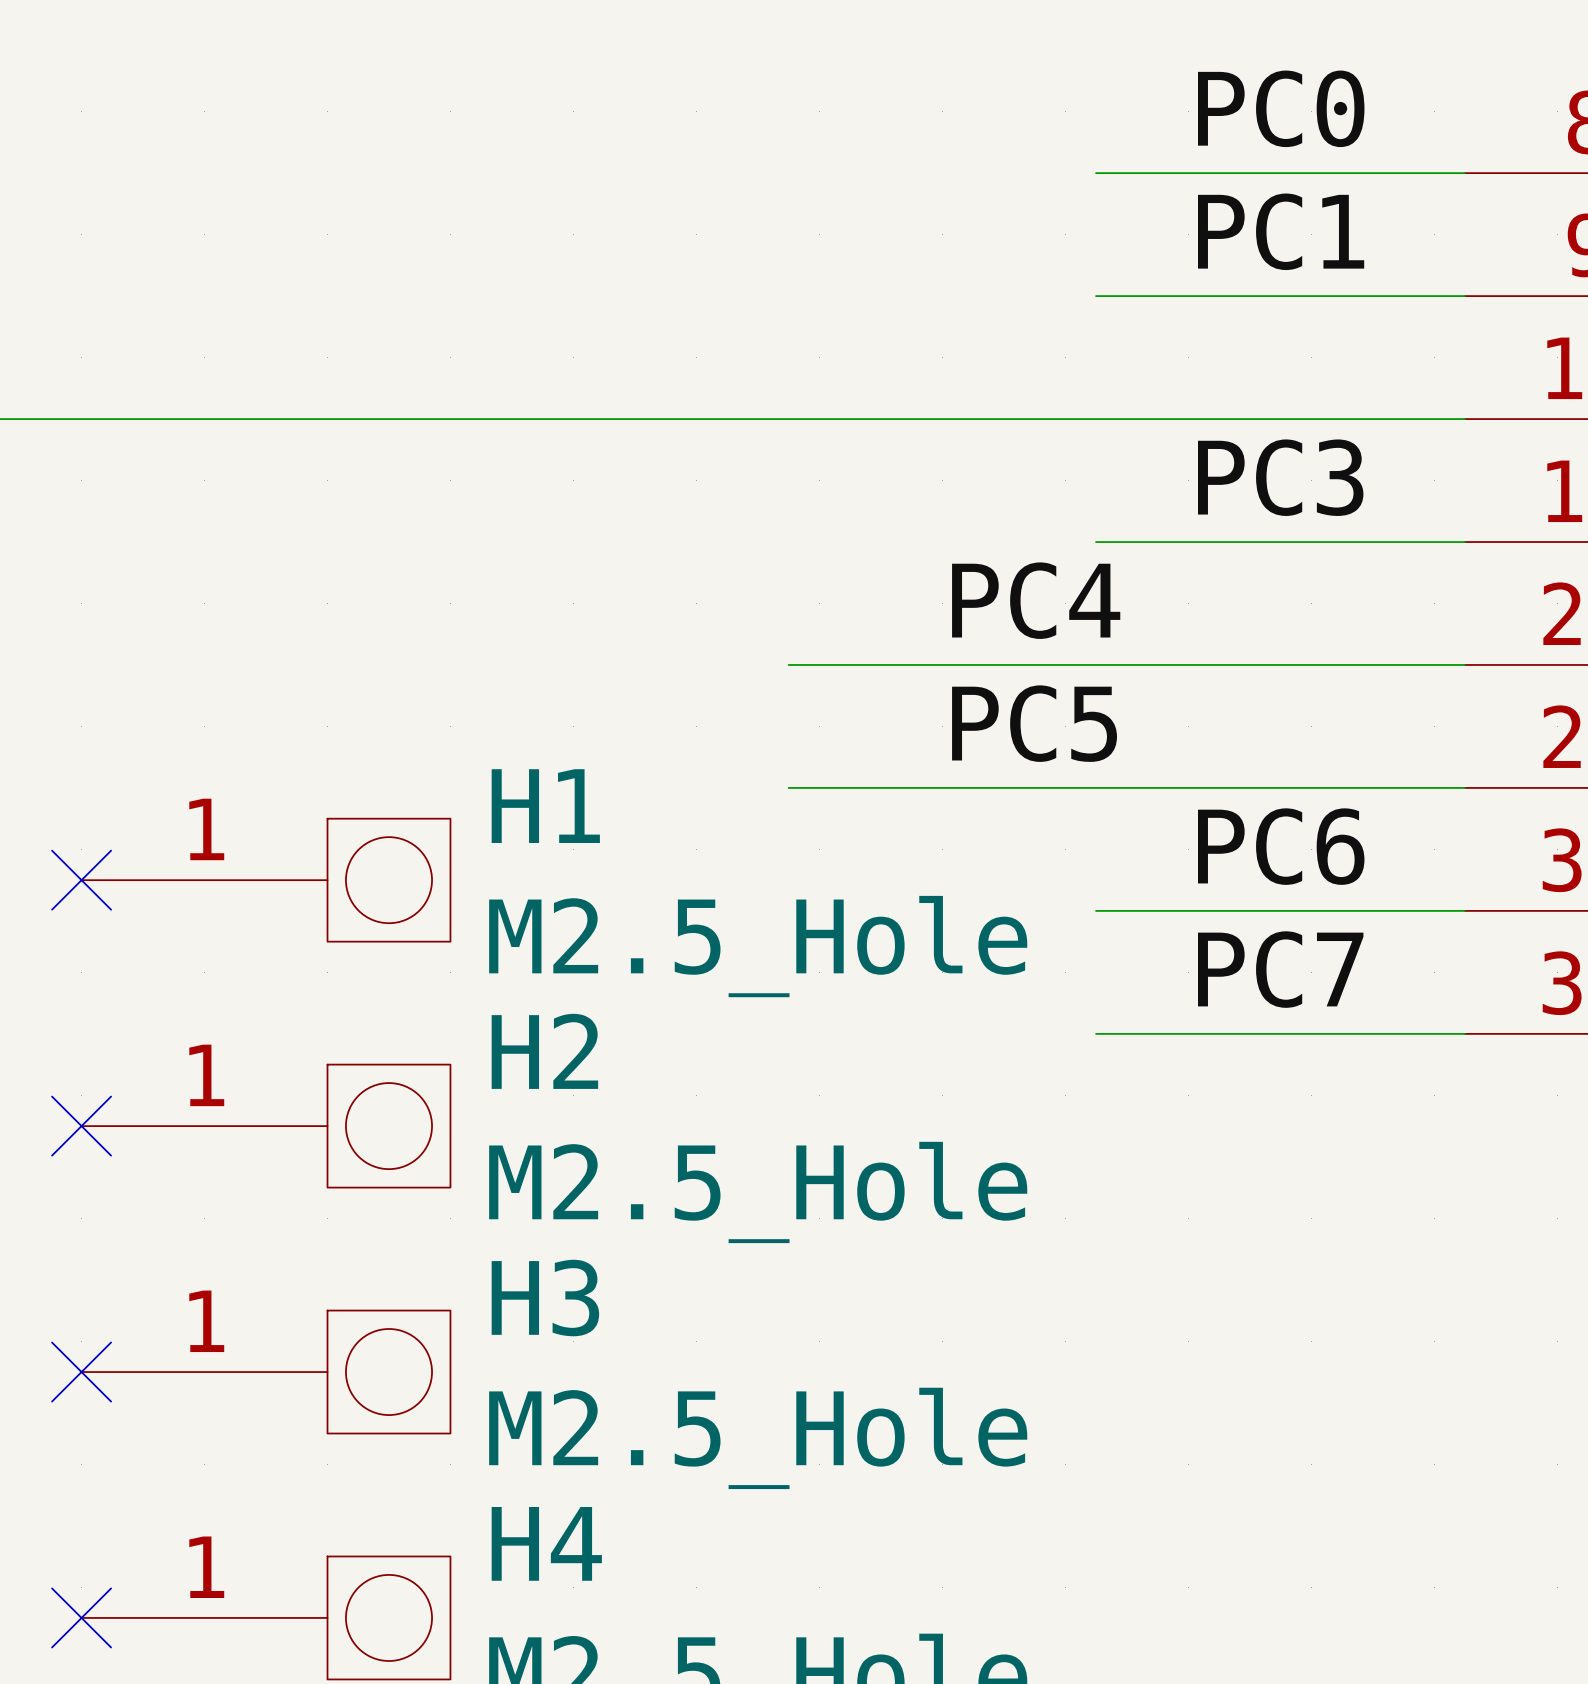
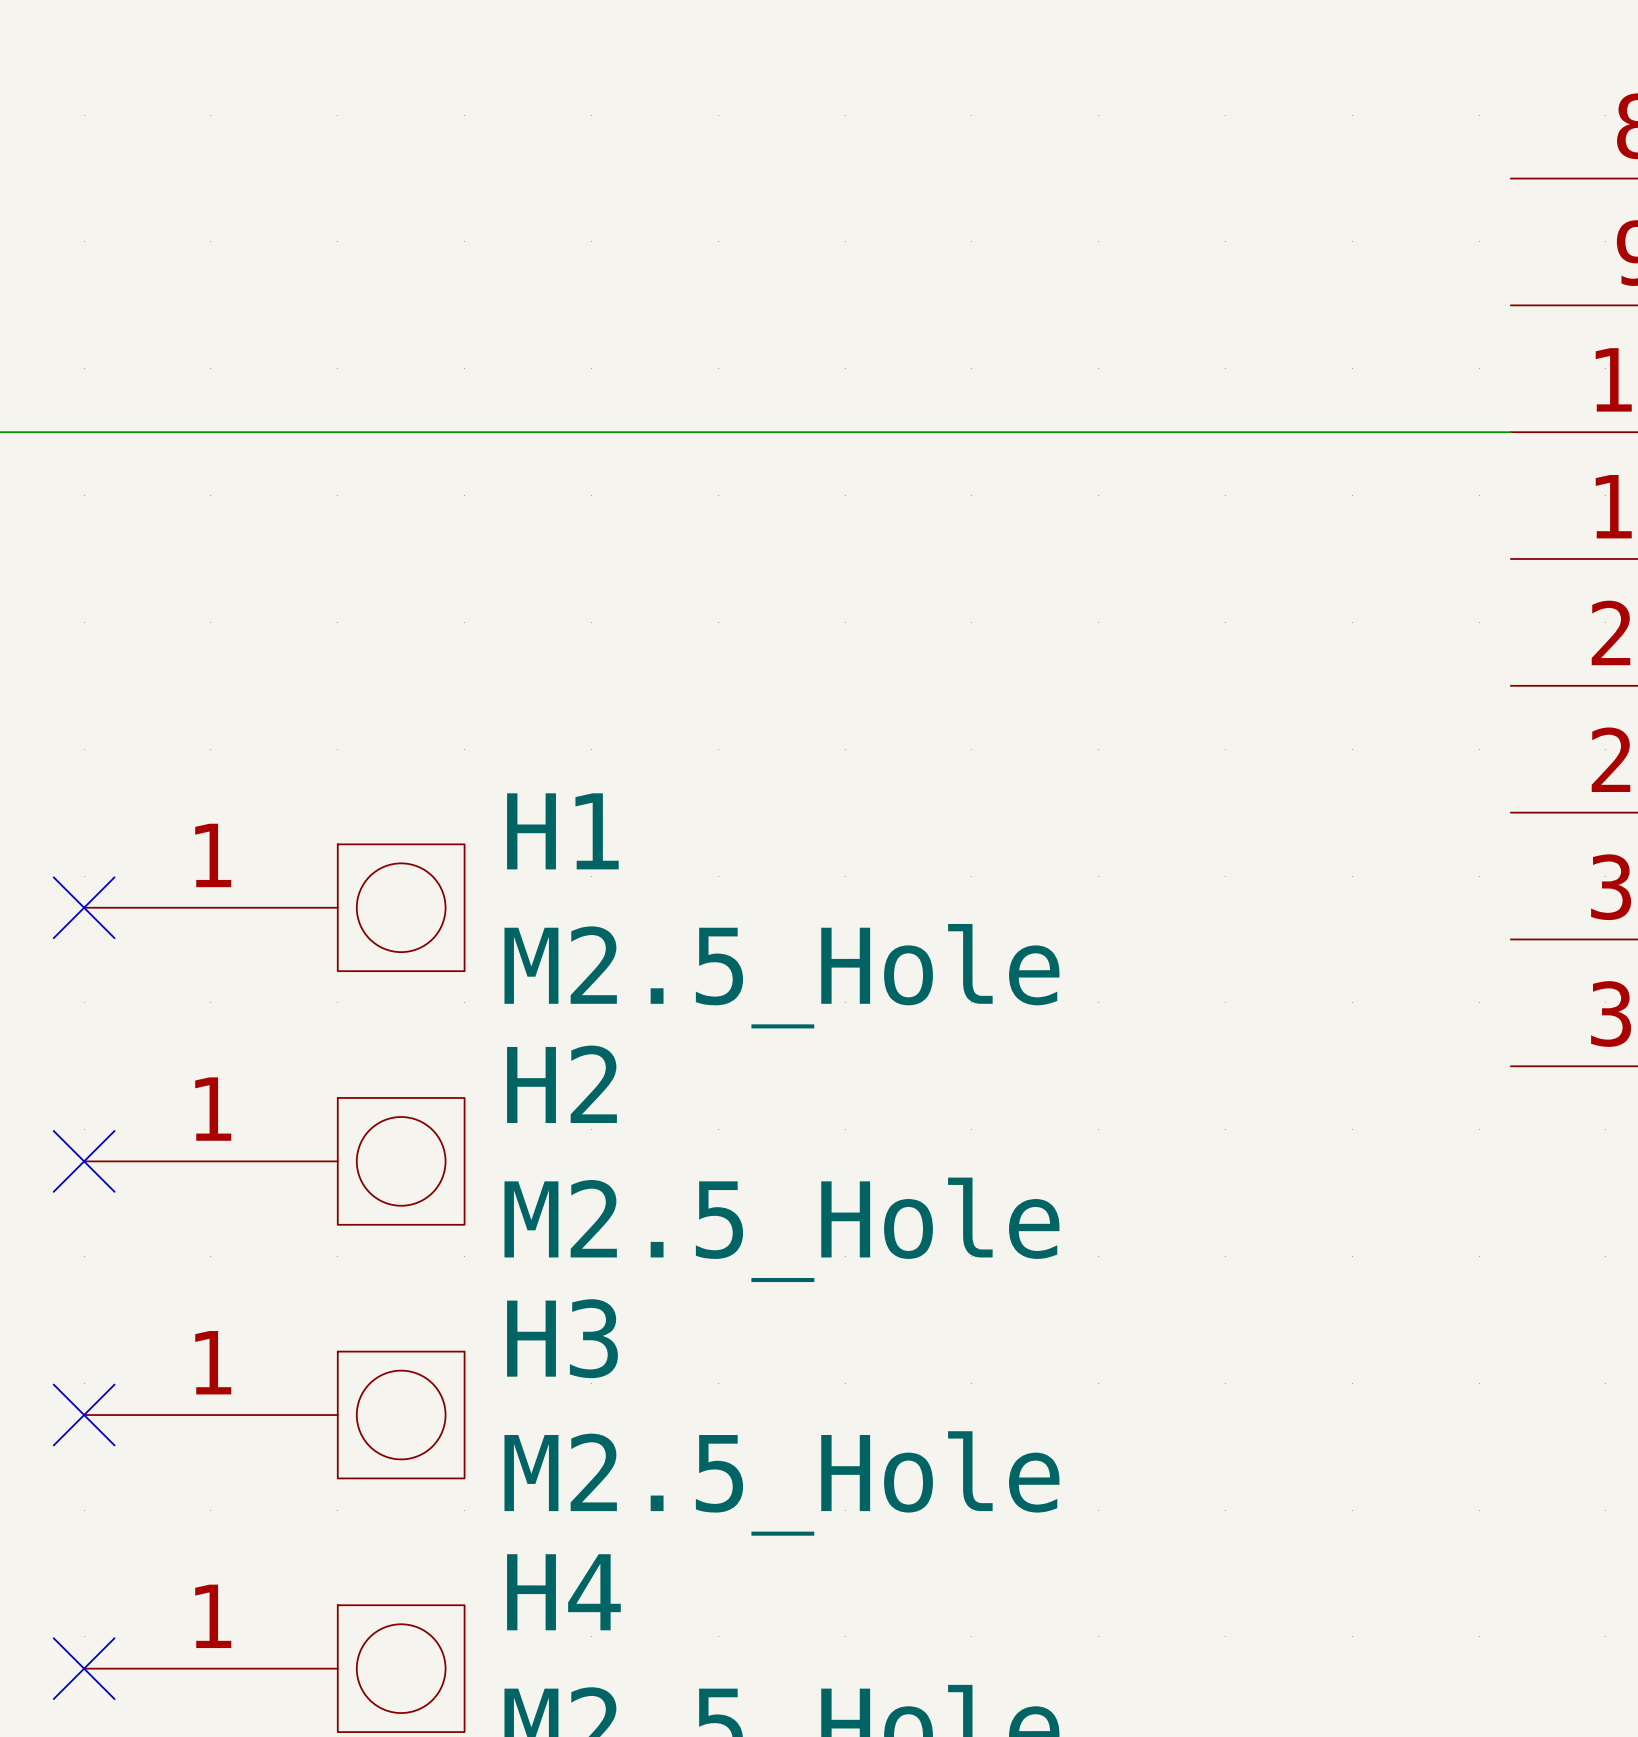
label: PC0 (1281, 108) -> none
wire: (1096, 173) (1464, 173) -> none
label: PC1 (1281, 231) -> none
wire: (1096, 296) (1464, 296) -> none
label: PC3 (1280, 477) -> none
wire: (1096, 542) (1464, 542) -> none
label: PC4 (1036, 600) -> none
wire: (788, 664) (1464, 664) -> none
label: PC5 (1034, 723) -> none
wire: (788, 787) (1464, 787) -> none
label: PC6 (1281, 846) -> none
wire: (1096, 910) (1464, 910) -> none
label: PC7 (1280, 969) -> none
wire: (1096, 1033) (1464, 1033) -> none

